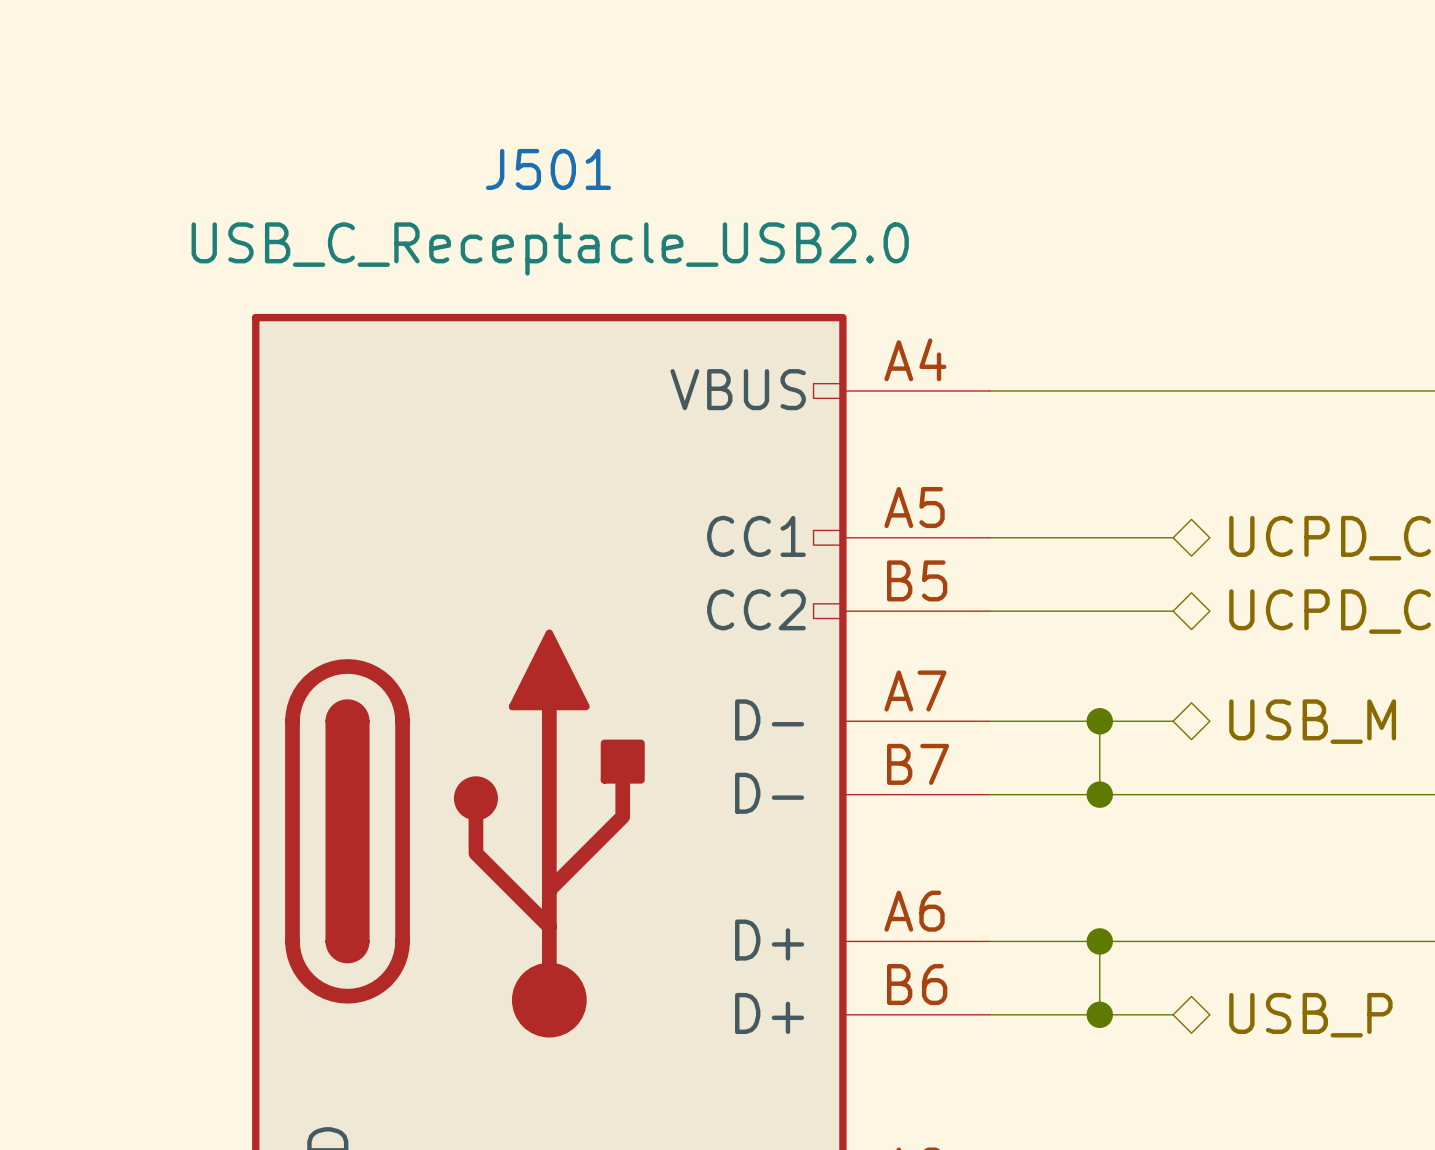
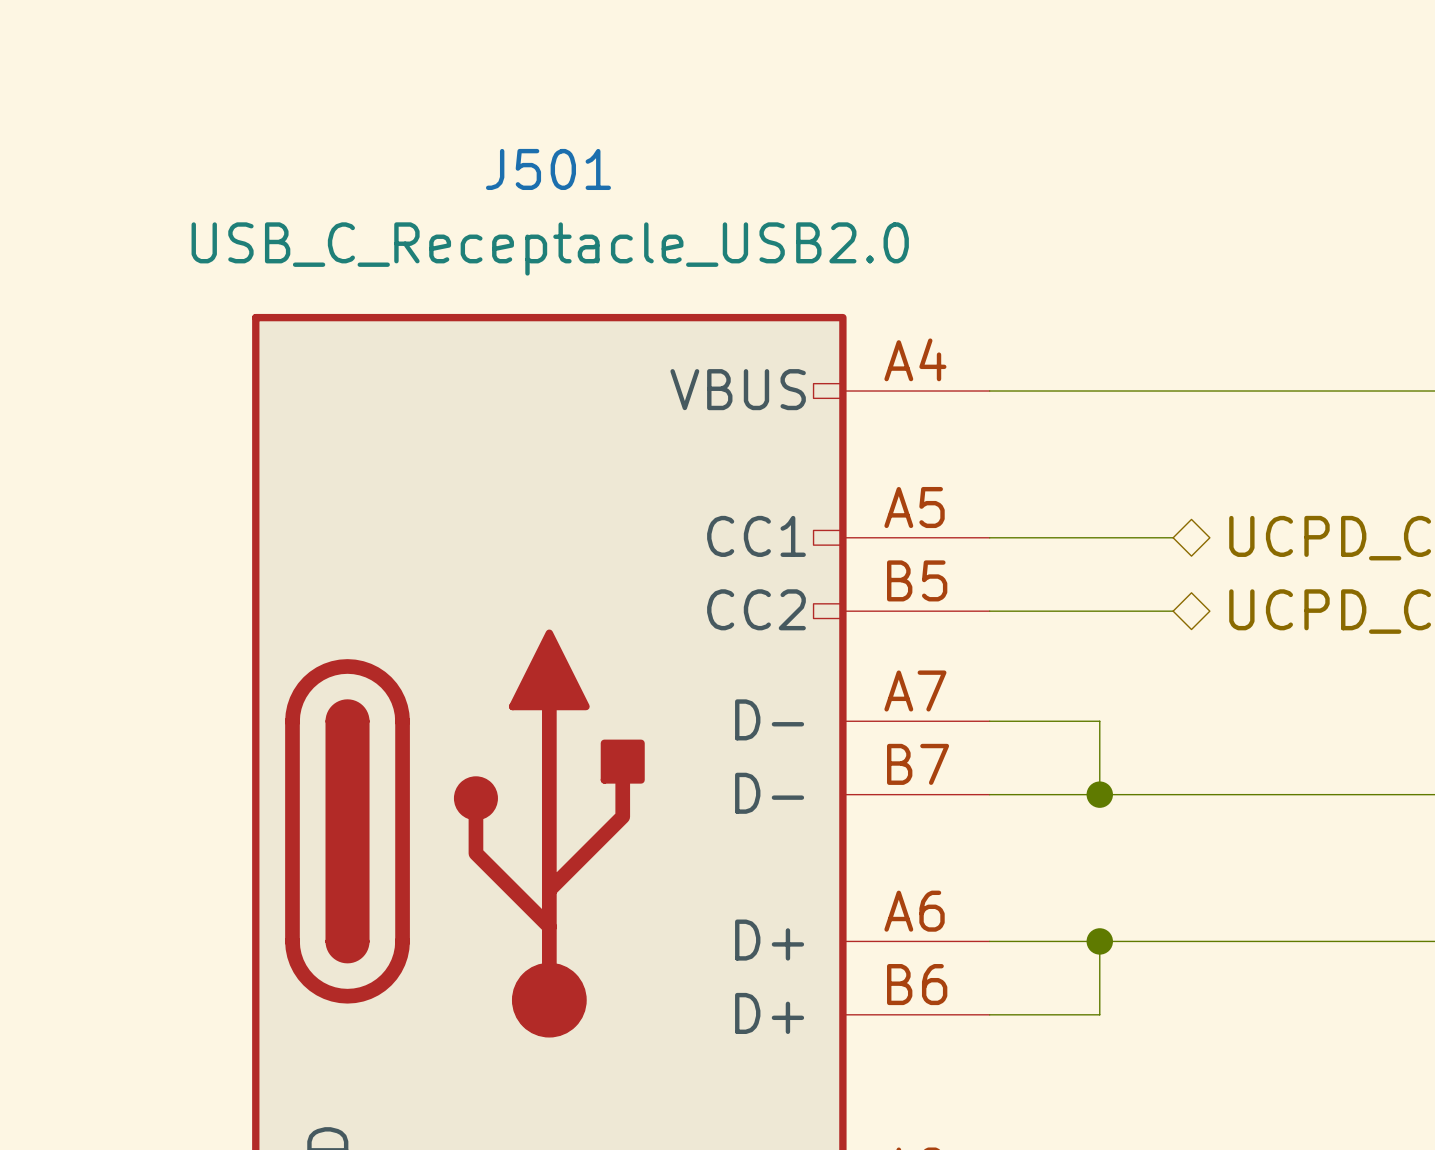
wire: (1099, 721) (1173, 721) -> none
junction: (1099, 721) -> none
hierarchical label: USB_M (1312, 721) -> none
wire: (1099, 1014) (1173, 1014) -> none
junction: (1099, 1014) -> none
hierarchical label: USB_P (1310, 1015) -> none

